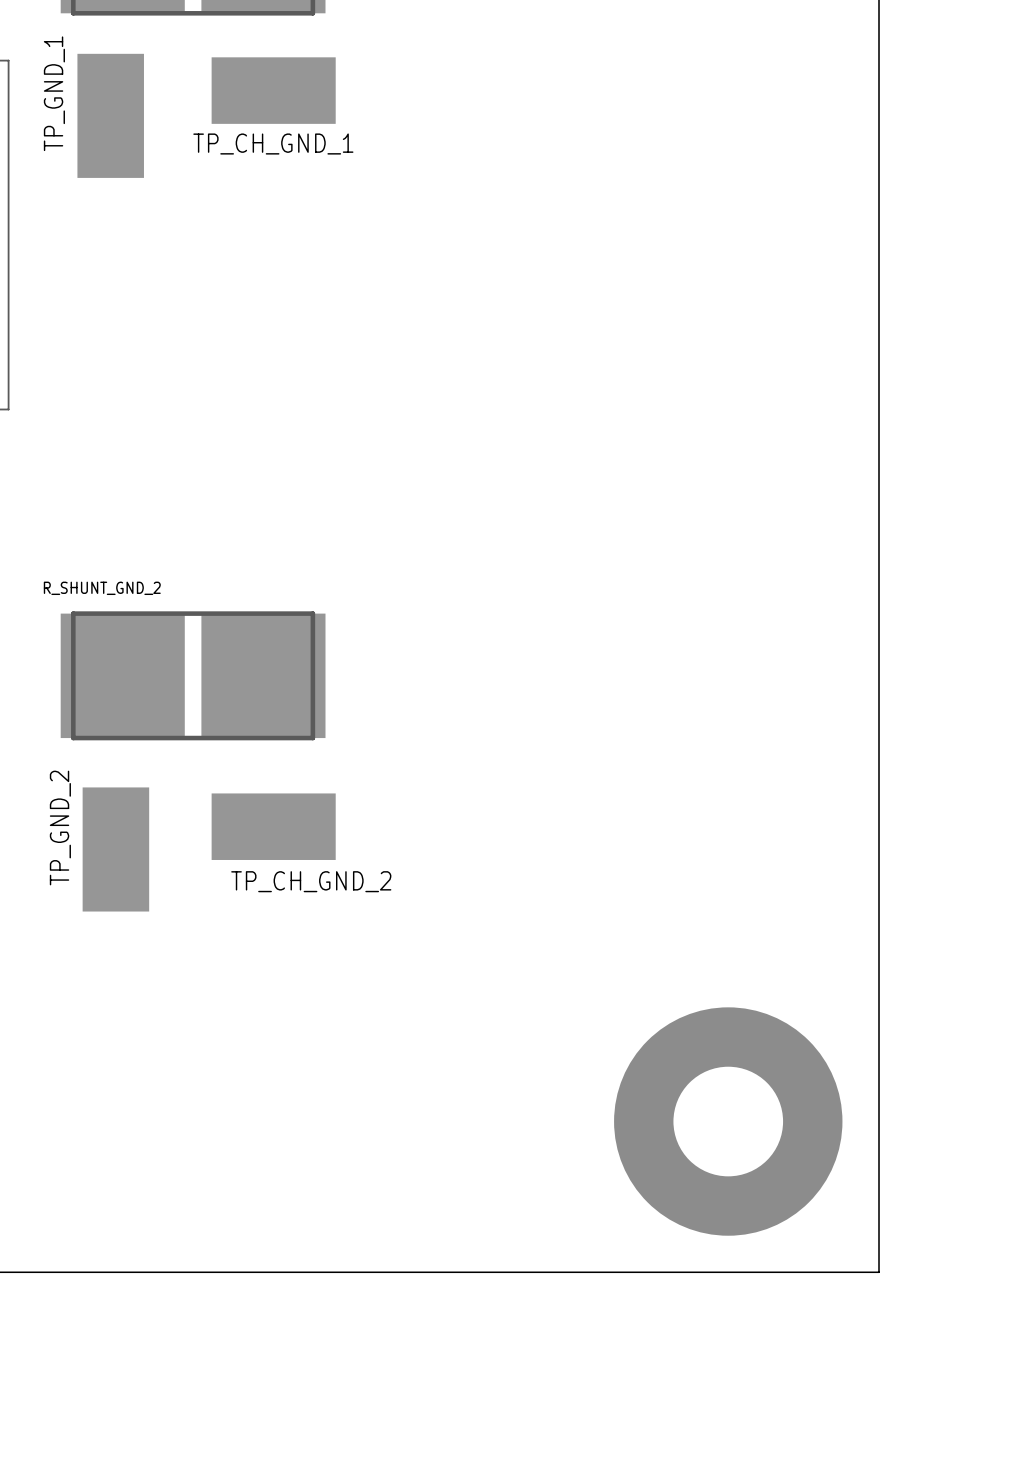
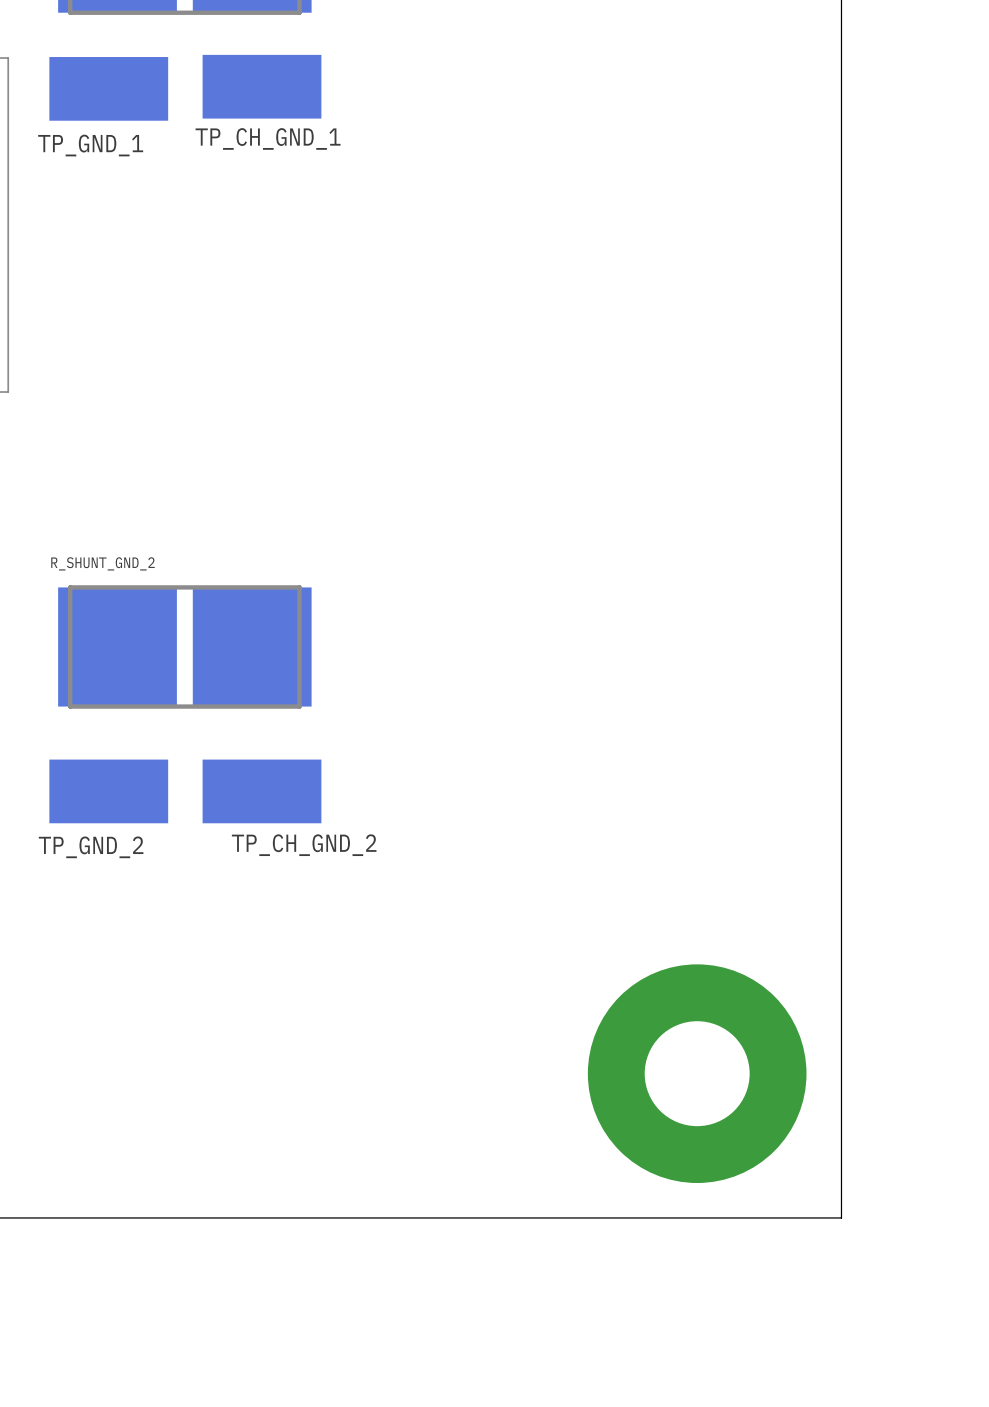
TP_GND_1 name position: TP_GND_1 (54, 93) -> TP_GND_1 (90, 145)
TP_GND_1 rotation: 0° (110, 115) -> 90° clockwise (108, 88)
TP_GND_2 name position: TP_GND_2 (60, 828) -> TP_GND_2 (91, 847)
TP_GND_2 rotation: 0° (115, 849) -> 90° clockwise (108, 791)

